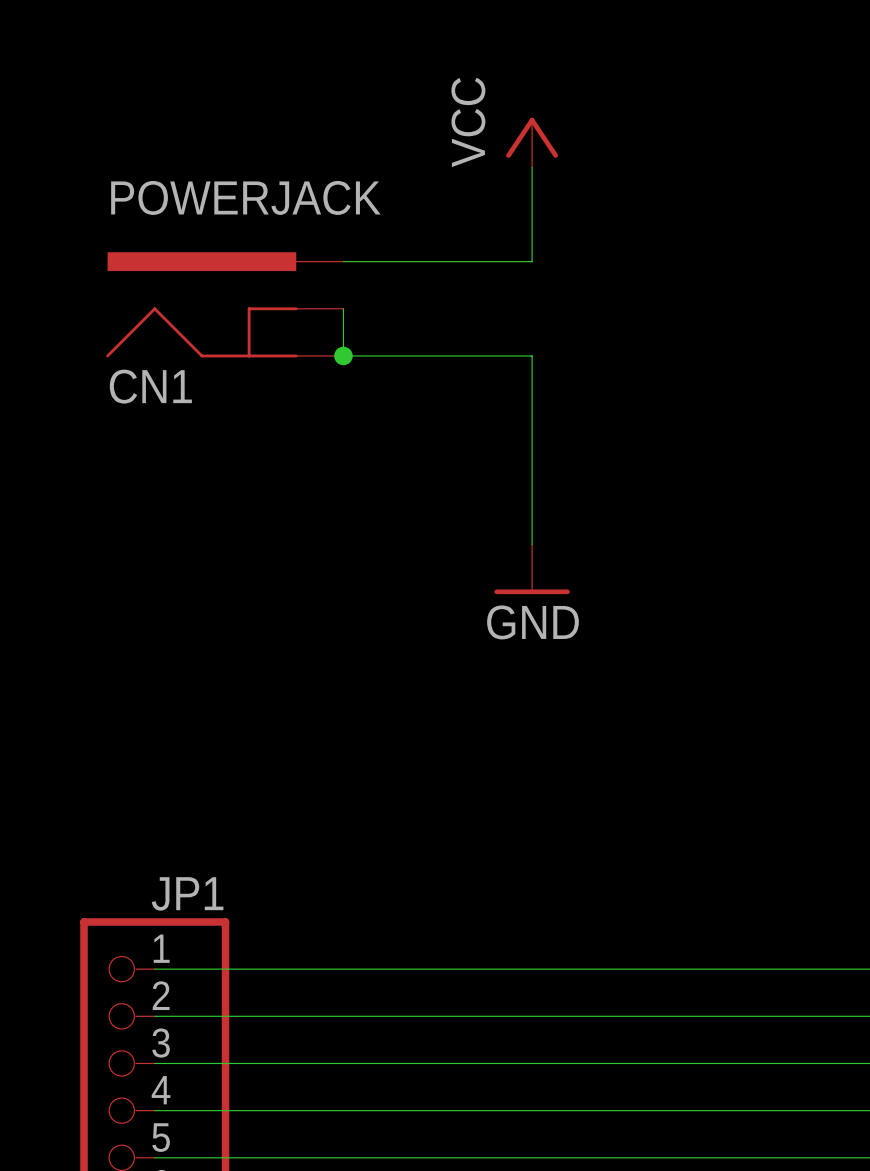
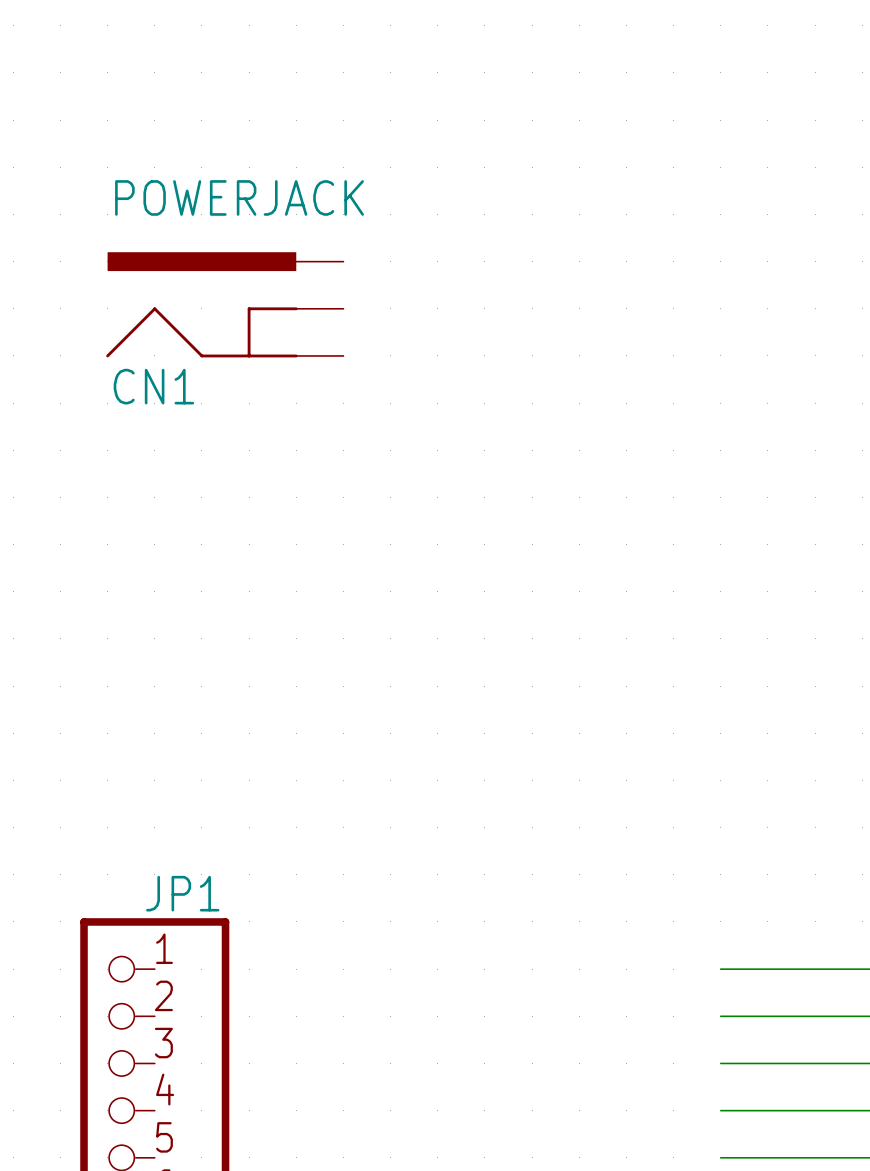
power symbol: VCC (532, 142) -> none
wire: (532, 167) (532, 261) (343, 261) -> none
wire: (343, 308) (343, 355) (532, 355) (532, 544) -> none
junction: (343, 355) -> none
power symbol: GND (532, 569) -> none
wire: (154, 969) (720, 969) -> none
wire: (154, 1016) (720, 1016) -> none
wire: (154, 1063) (720, 1063) -> none
wire: (154, 1110) (720, 1110) -> none
wire: (154, 1157) (720, 1157) -> none

